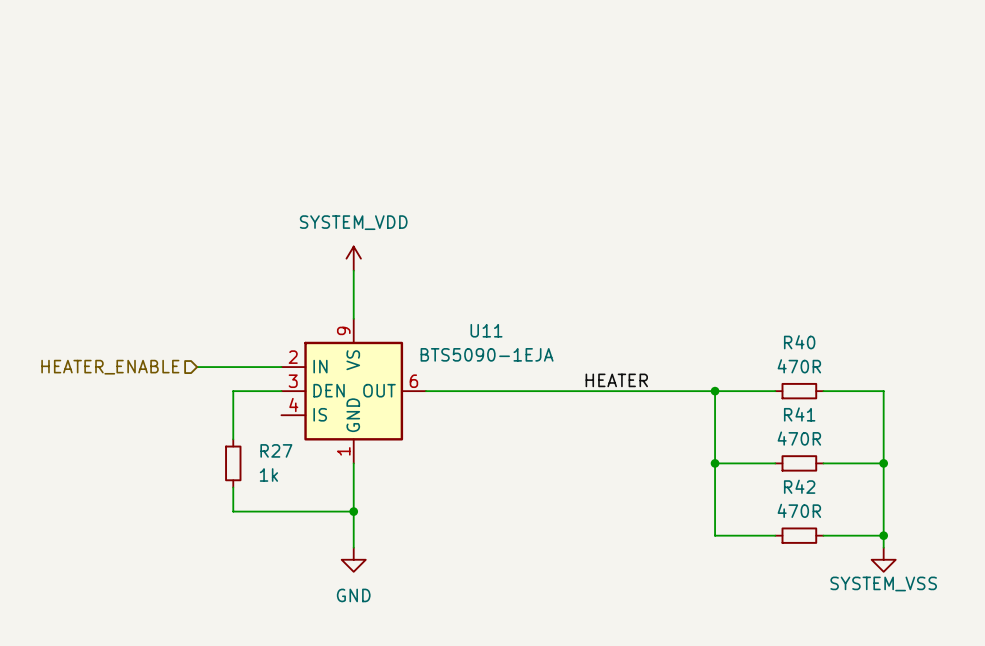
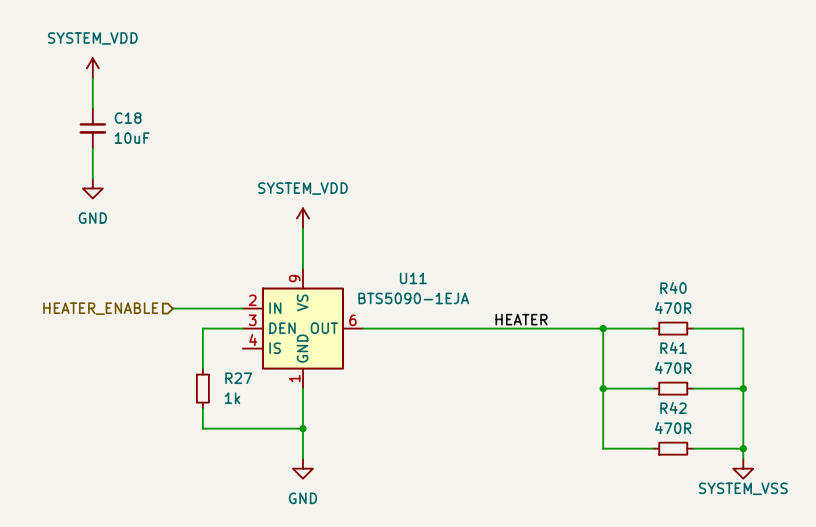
power symbol: none -> SYSTEM_VDD (92, 68)
wire: none -> (92, 78) (92, 108)
C18: none -> 10uF (92, 128)
wire: none -> (92, 148) (92, 178)
power symbol: none -> GND (92, 188)

